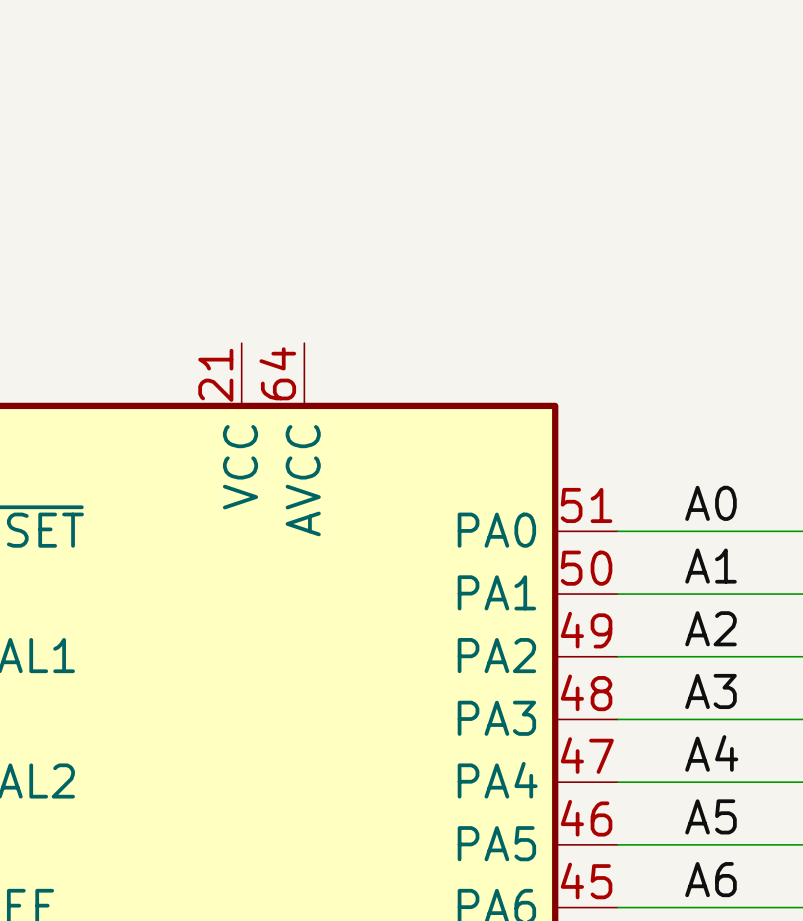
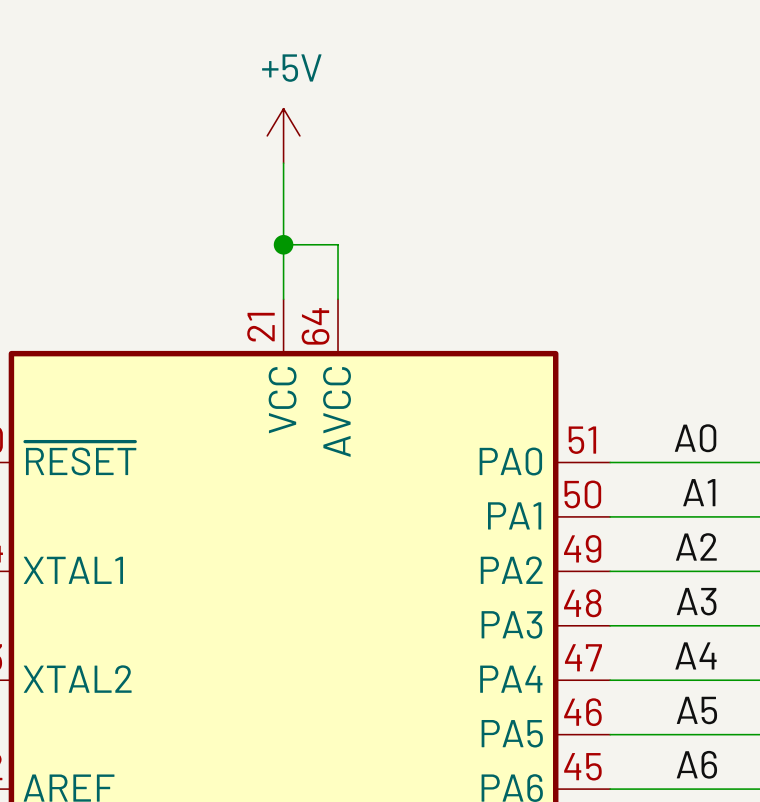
power symbol: none -> +5V (283, 135)
wire: none -> (283, 163) (283, 299)
wire: none -> (283, 244) (338, 244) (338, 299)
junction: none -> (283, 244)

